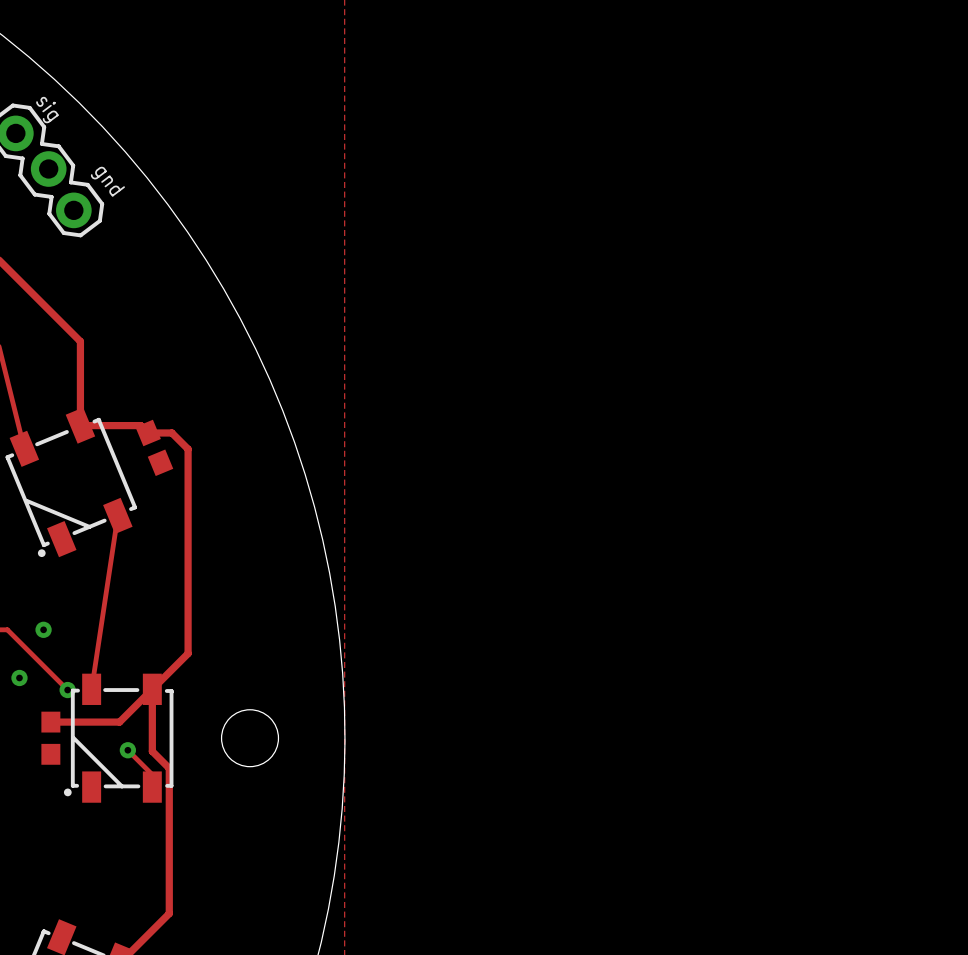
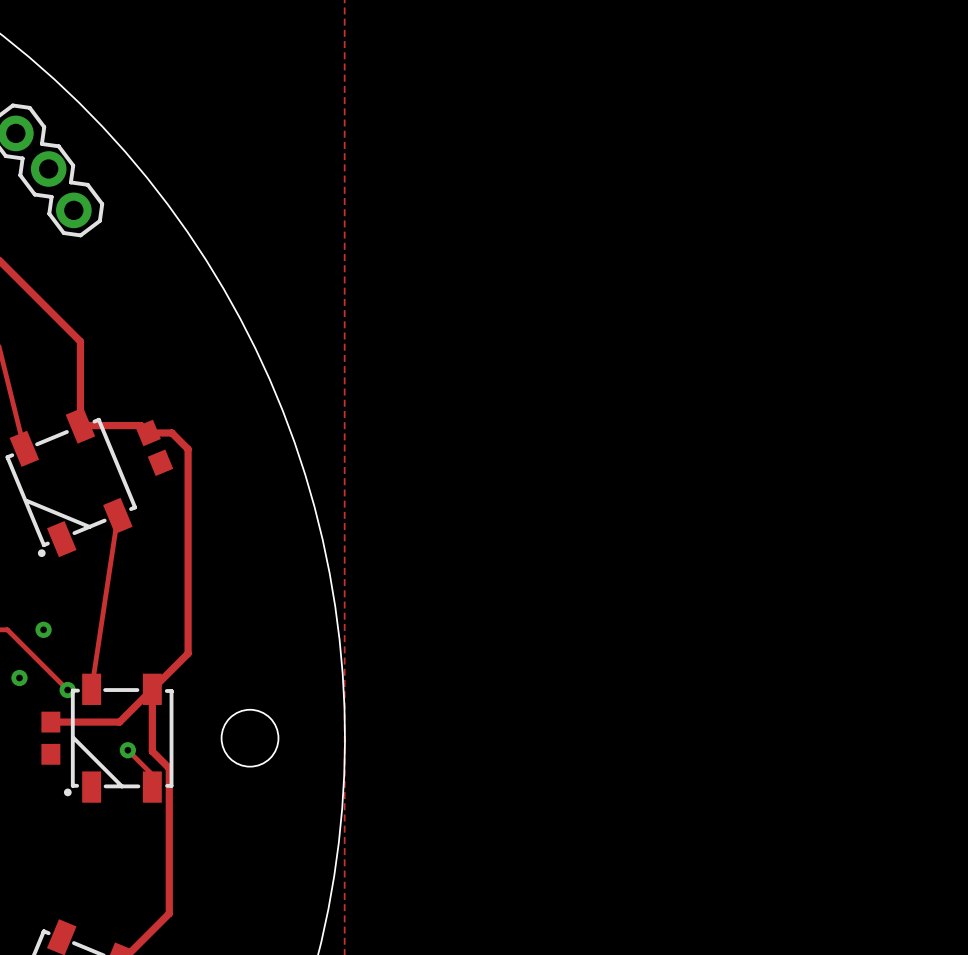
text: sig (47, 110) -> none
text: gnd (107, 181) -> none

